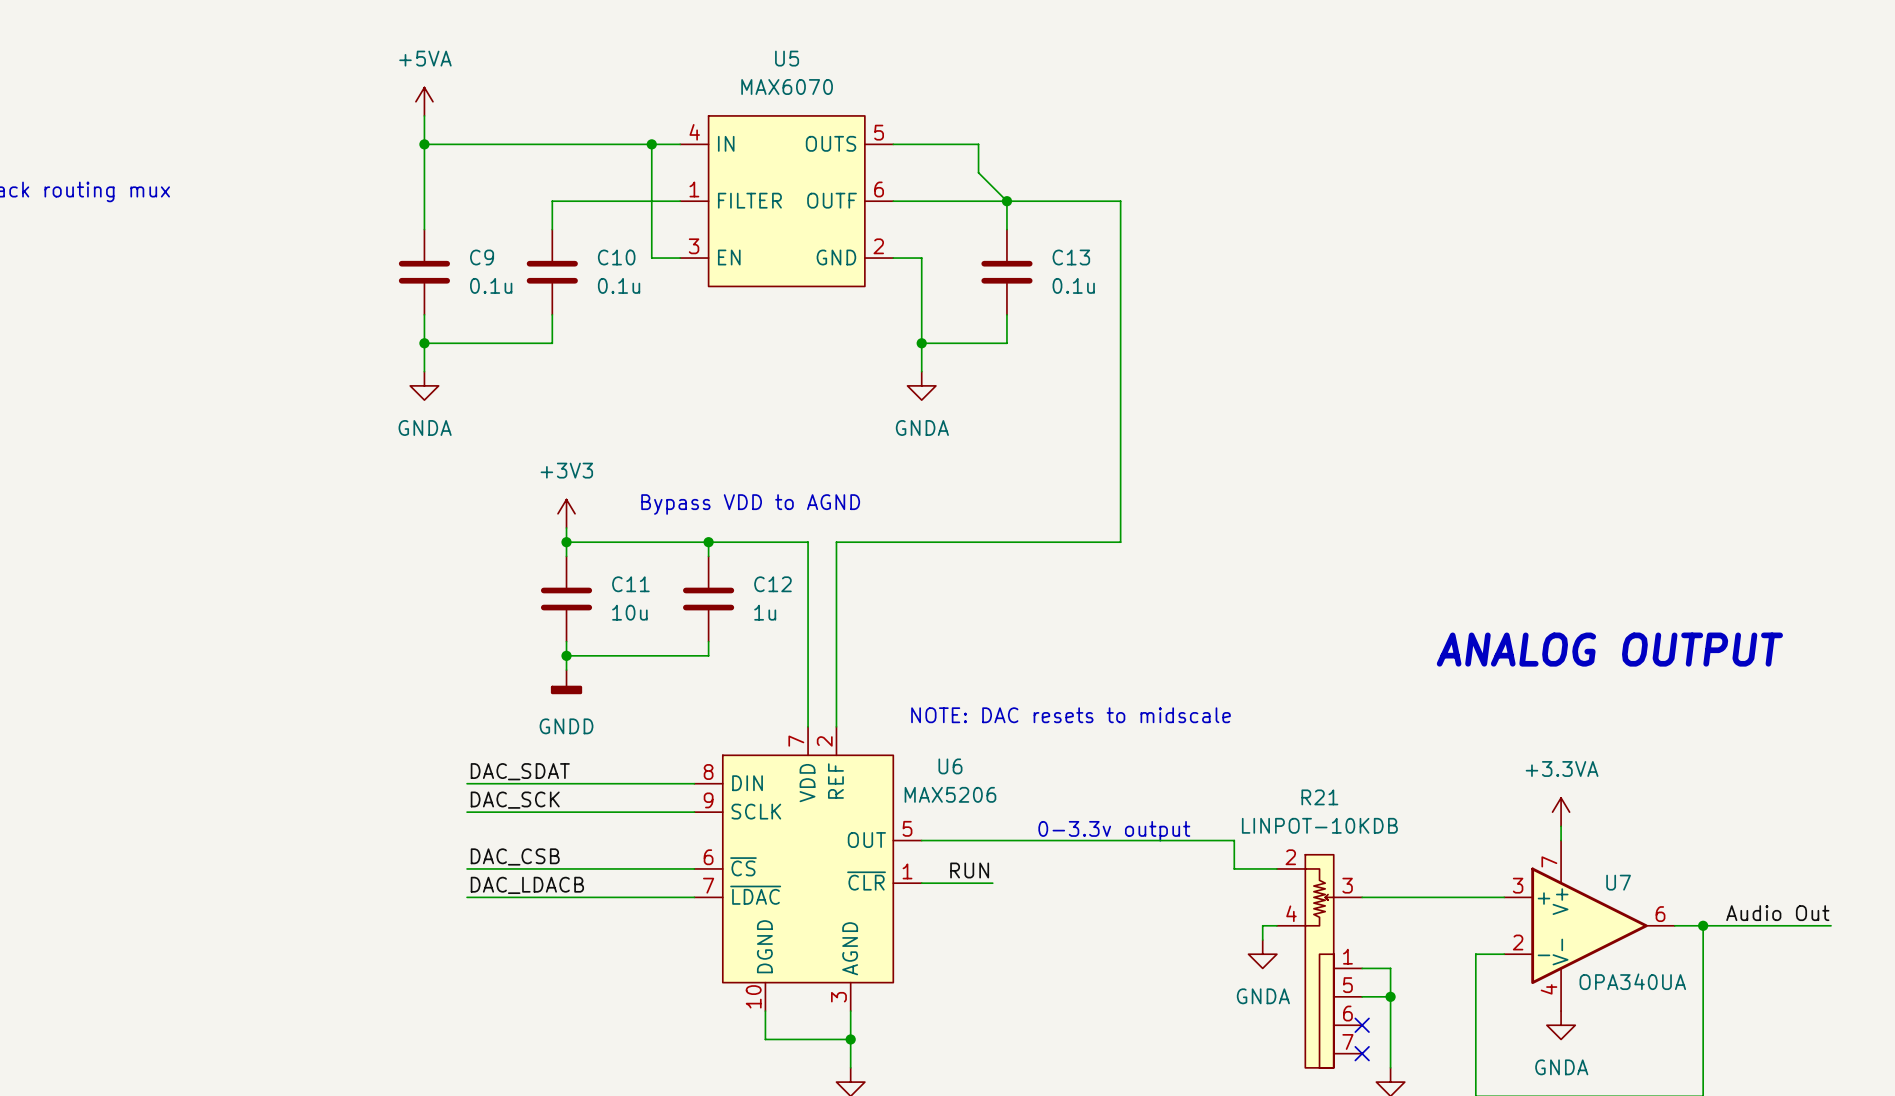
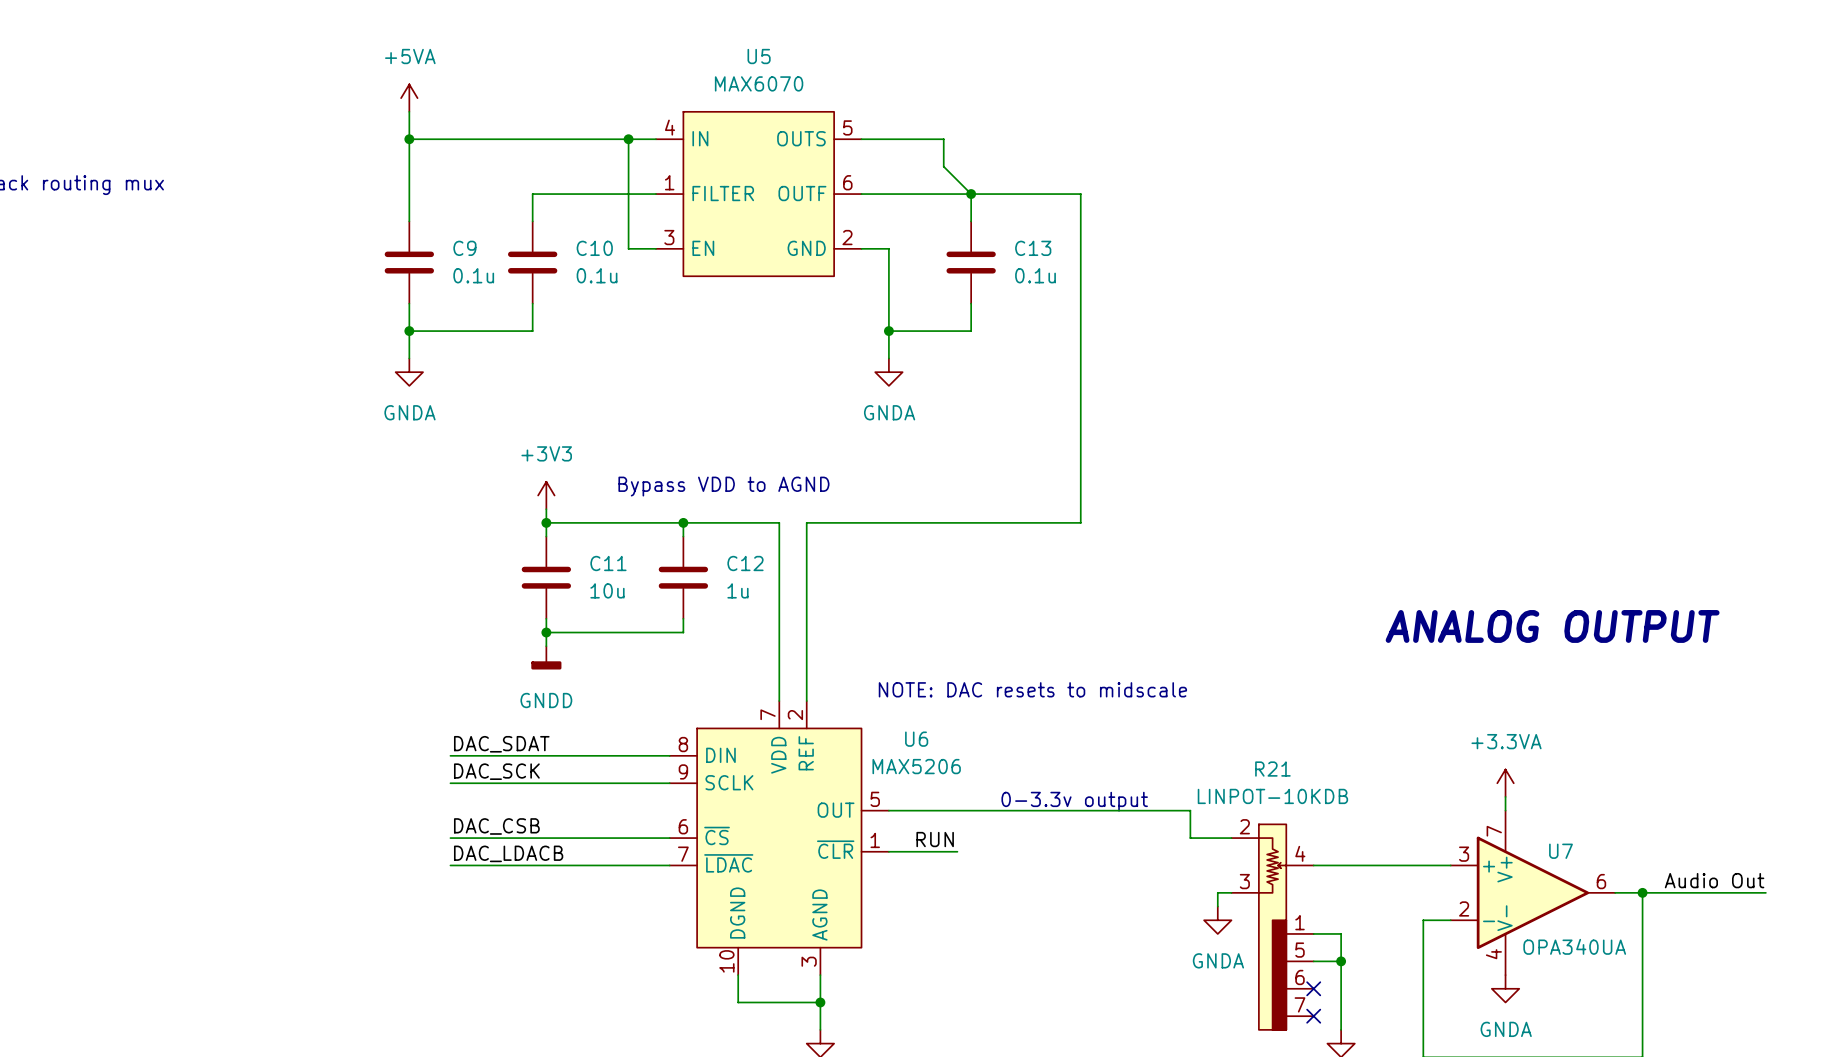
R21 symbol: [1276, 854, 1363, 1068] -> [1231, 824, 1314, 1030]

